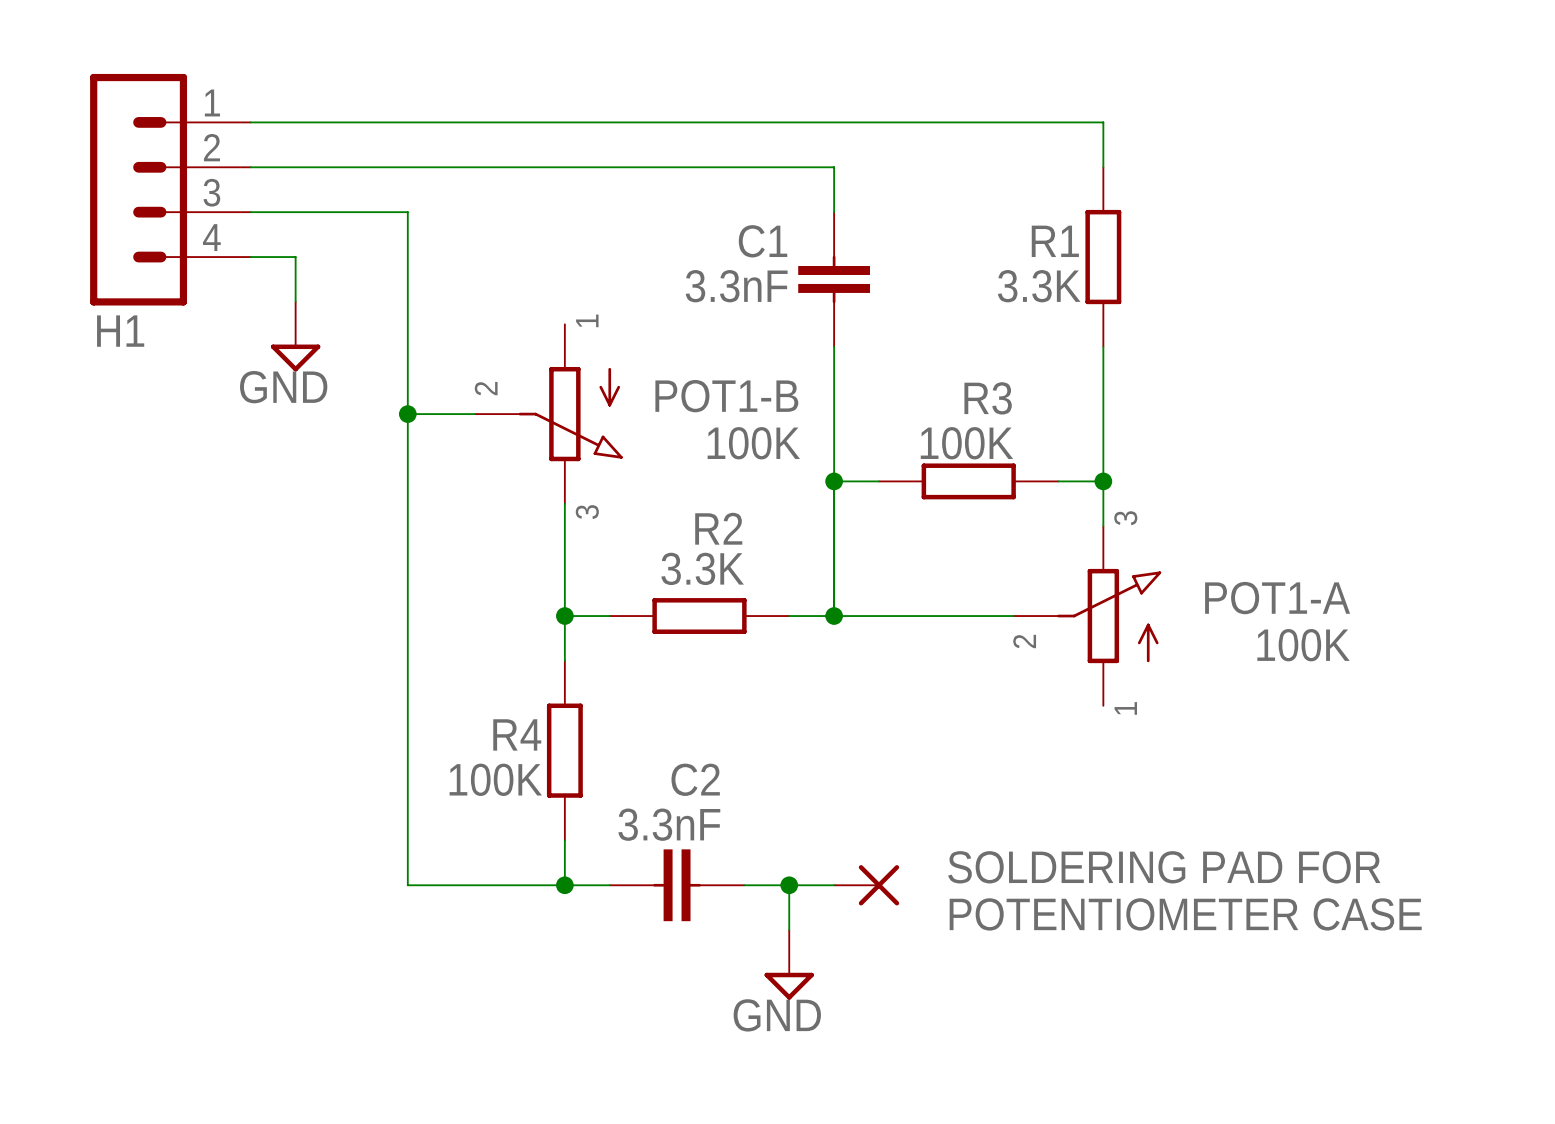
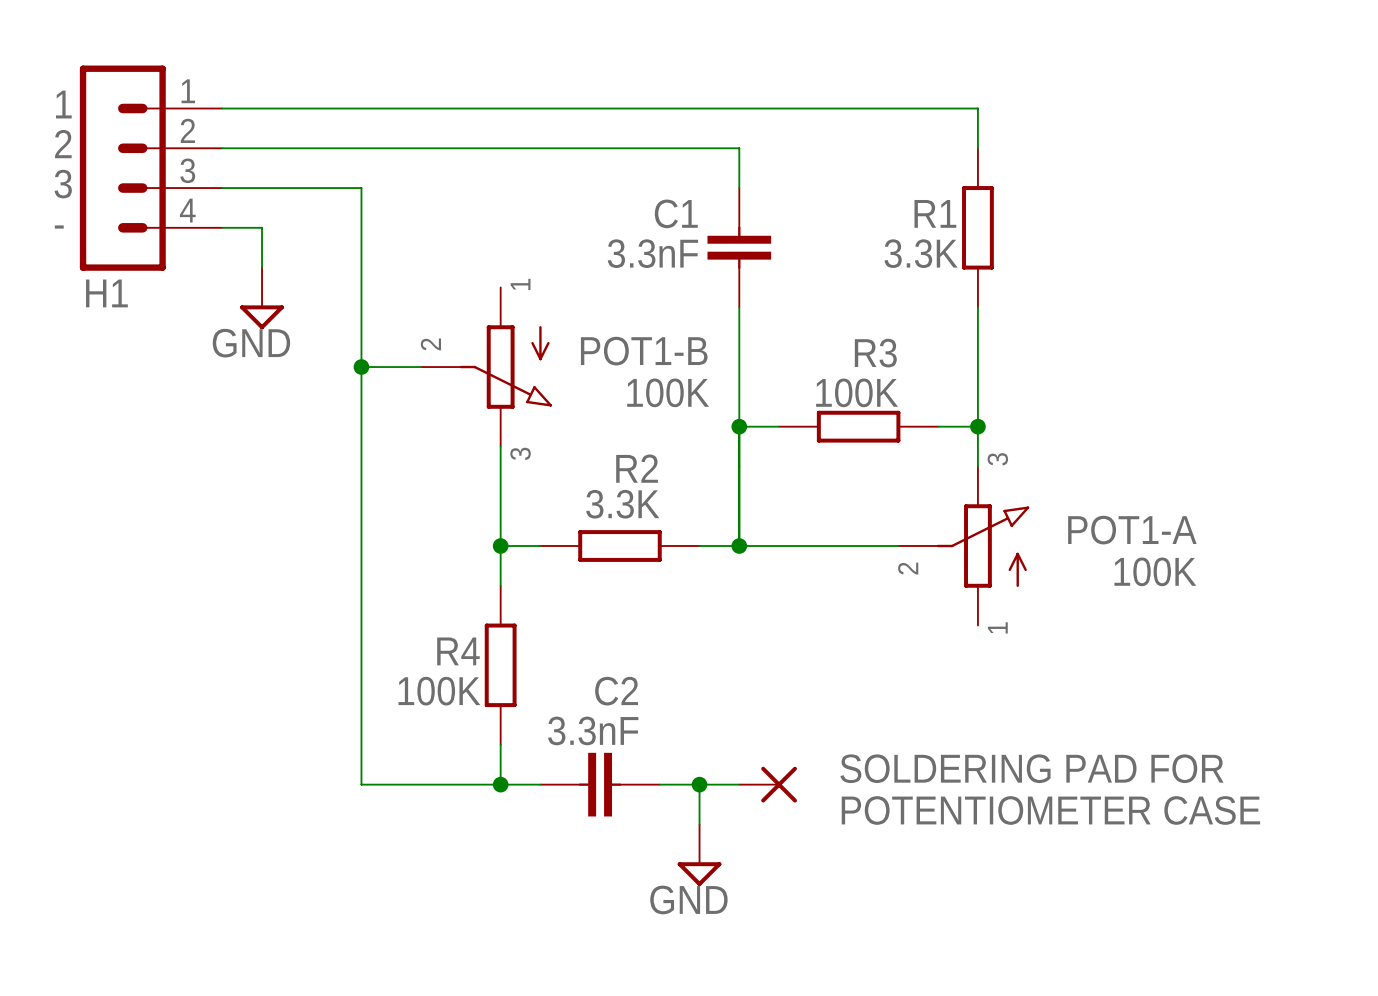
text: none -> 1 (63, 104)
text: none -> 2 (63, 144)
text: none -> 3 (63, 184)
text: none -> - (59, 227)

